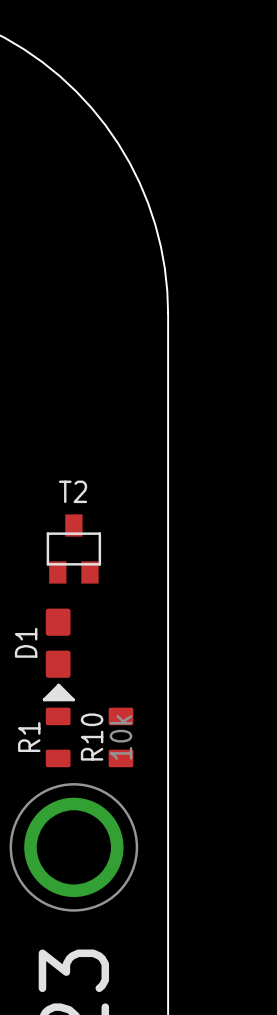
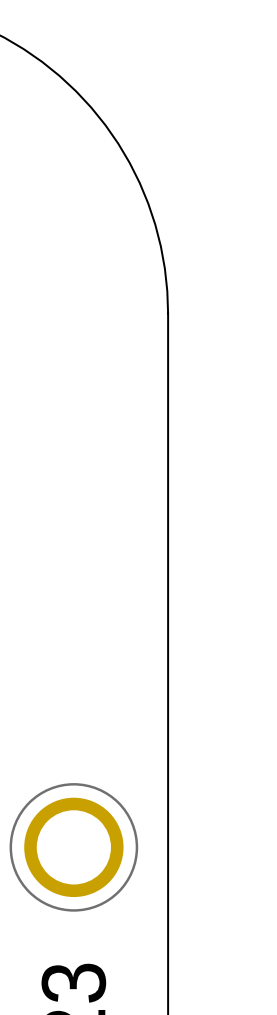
T2: (73, 548) -> none
D1: (58, 654) -> none
R1: (58, 737) -> none
R10: 10k (120, 737) -> none

